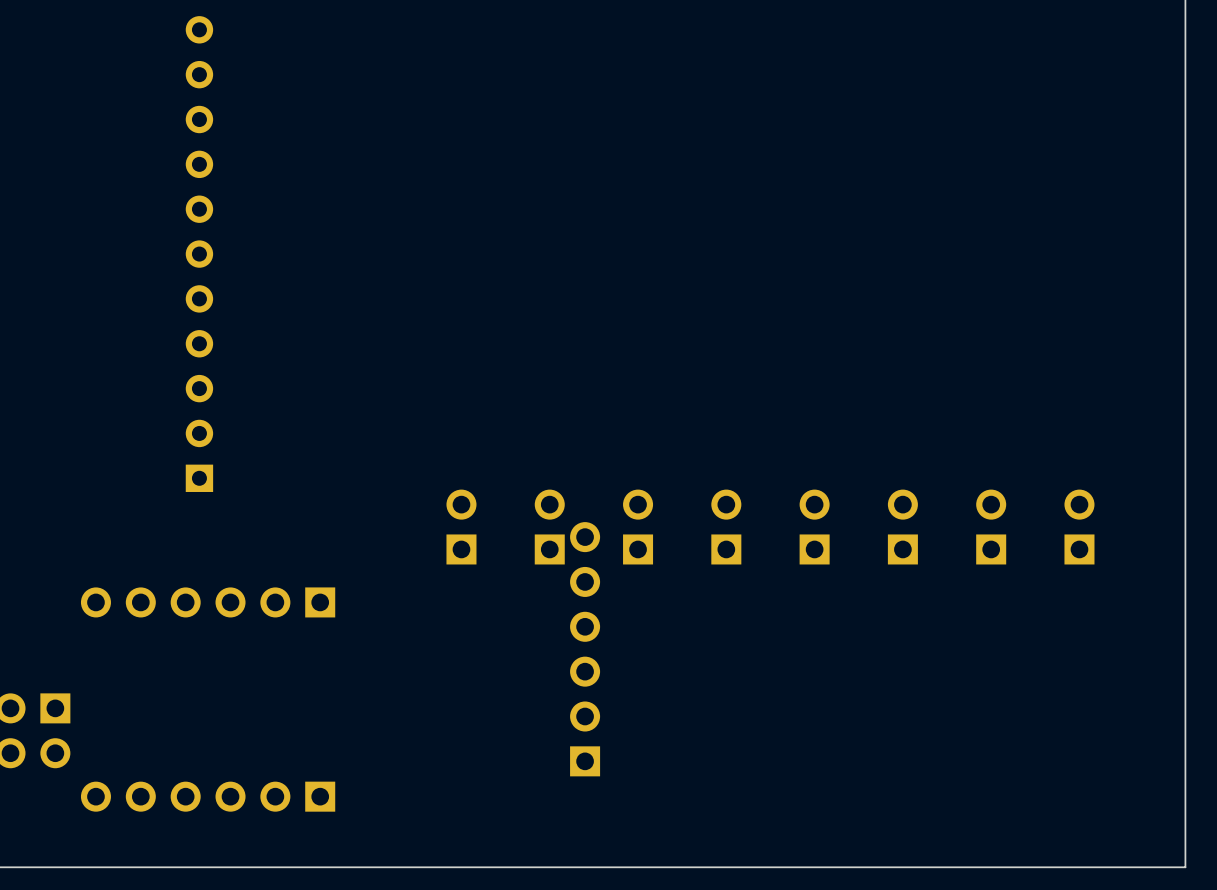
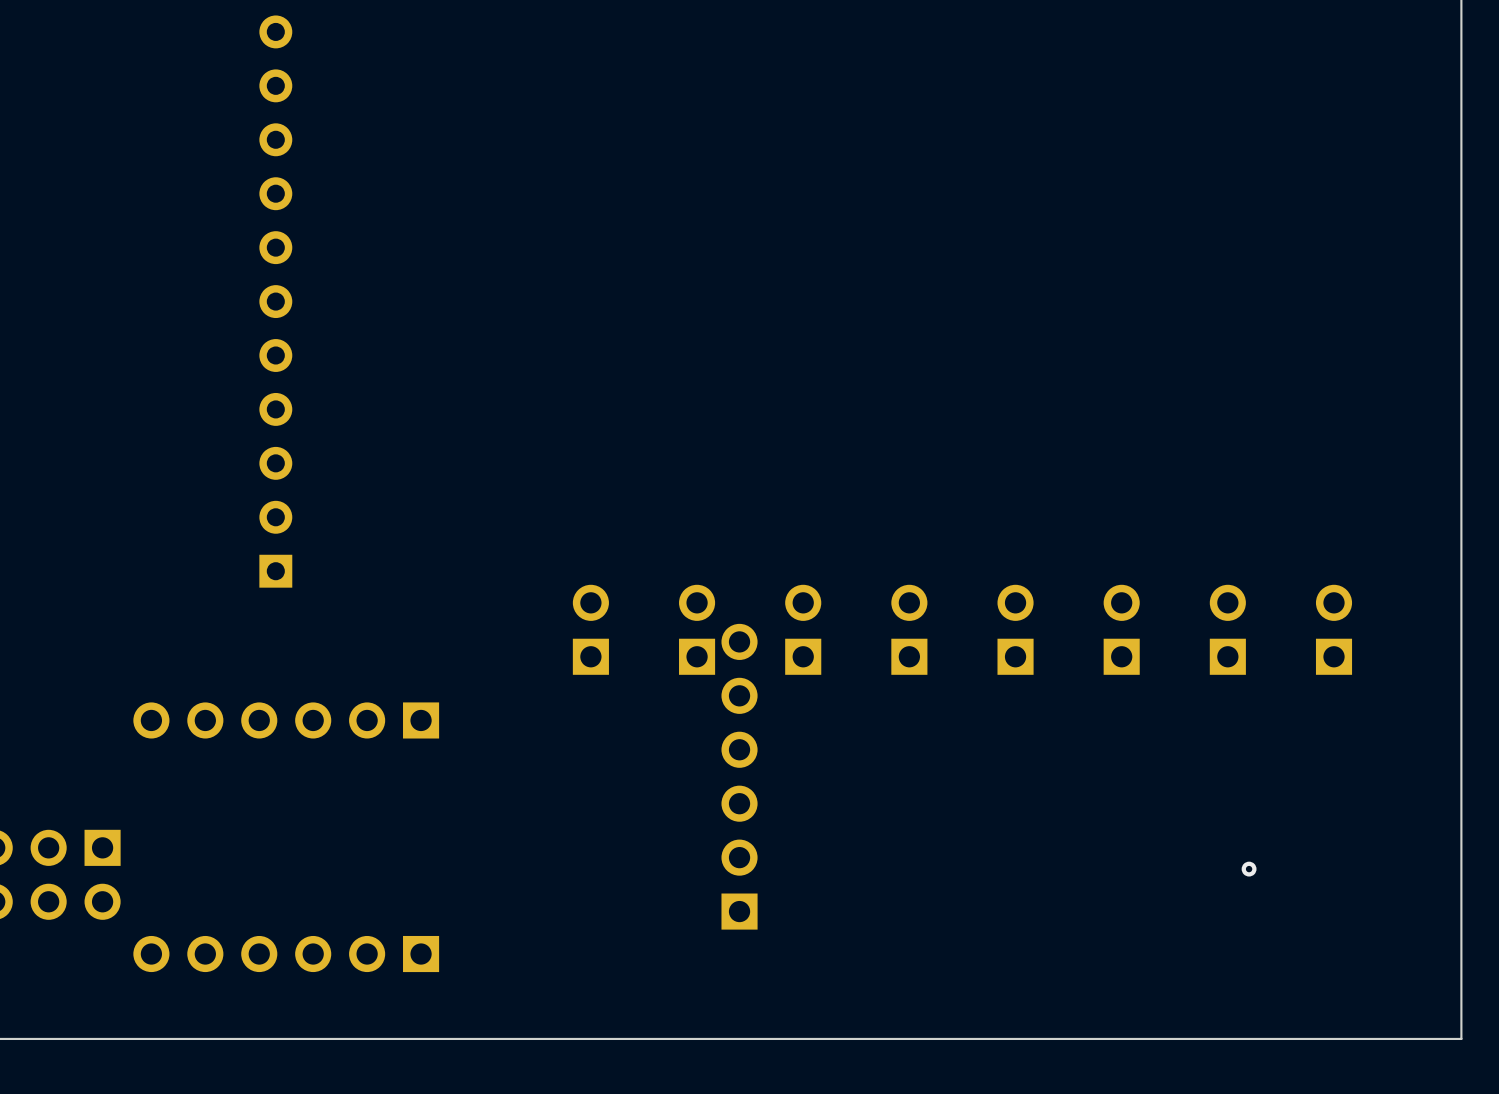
via: none -> (1249, 869)

